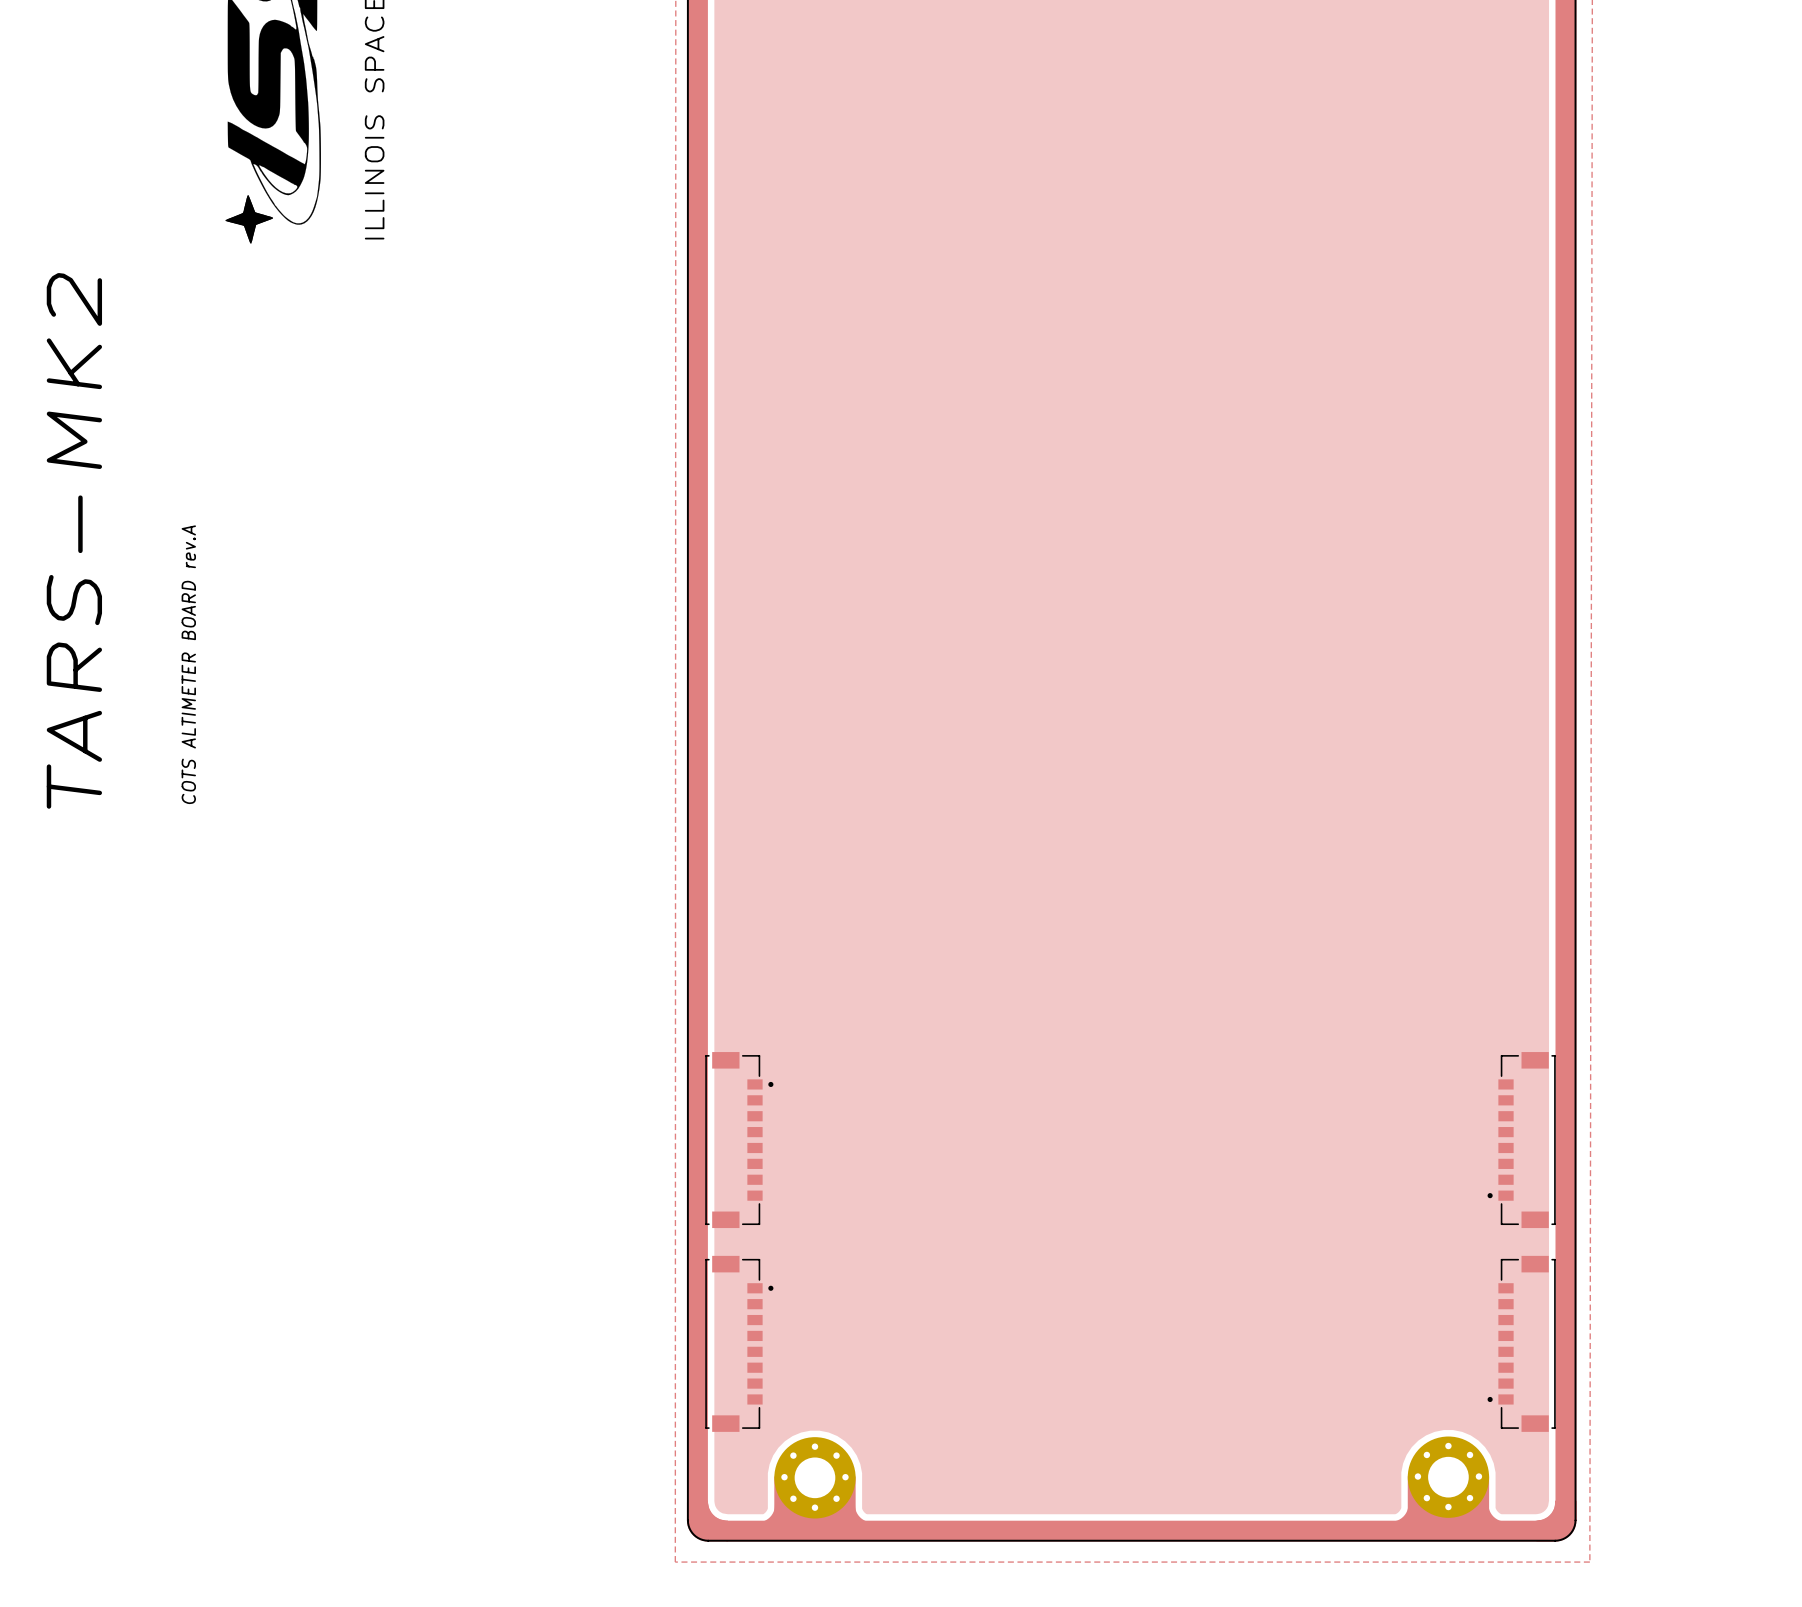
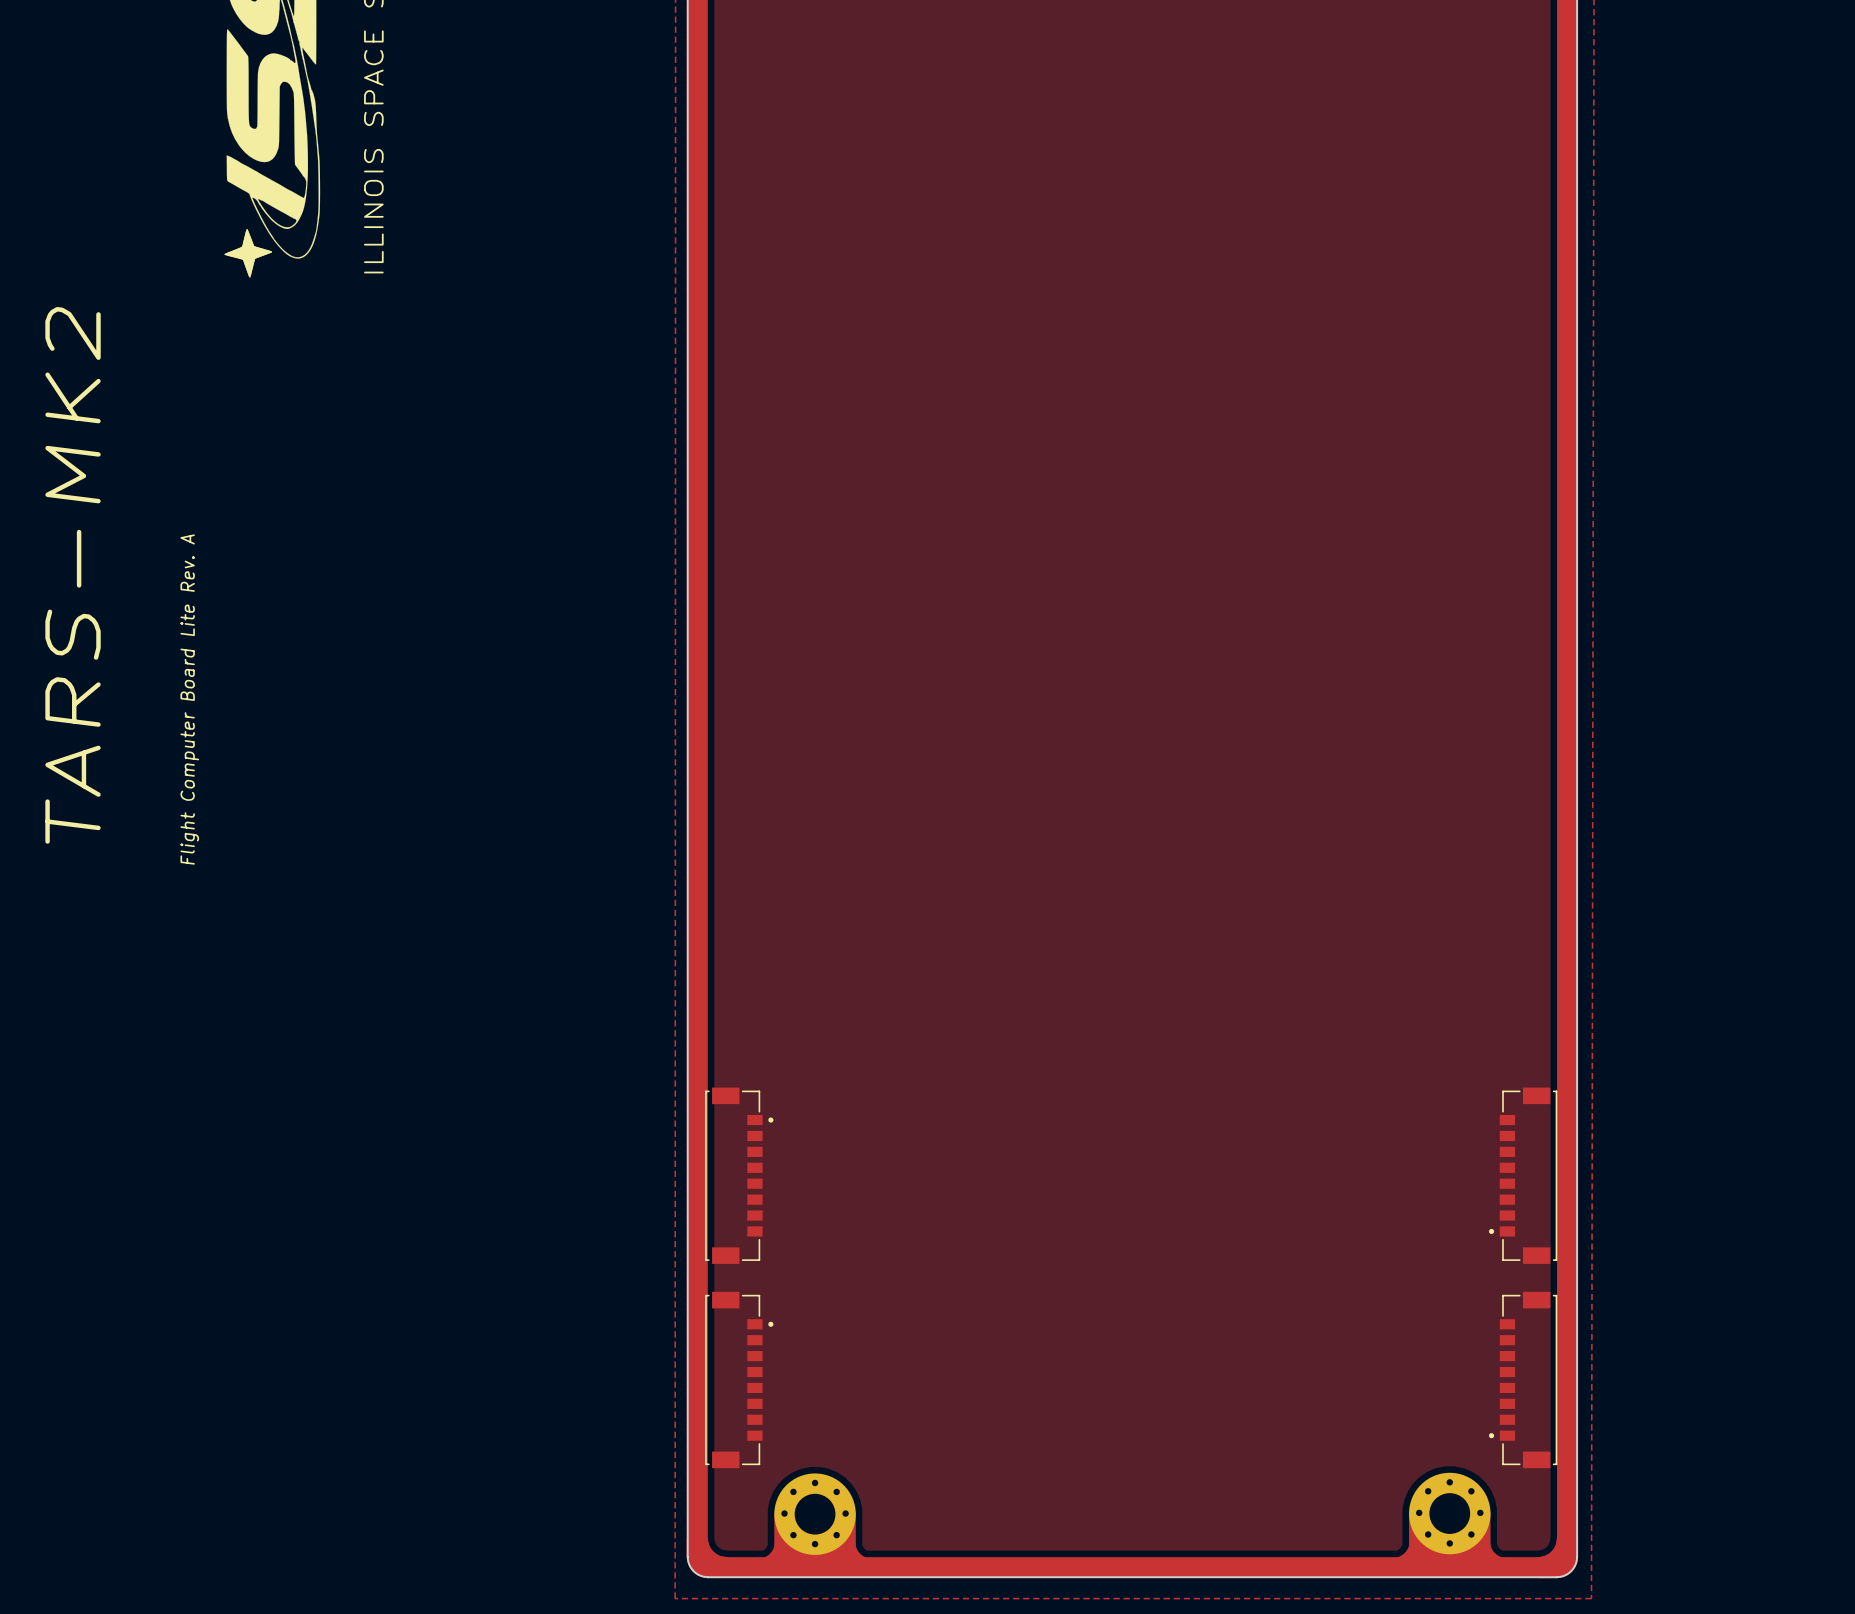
text: COTS ALTIMETER BOARD rev.A (188, 664) -> Flight Computer Board Lite Rev. A (189, 699)

